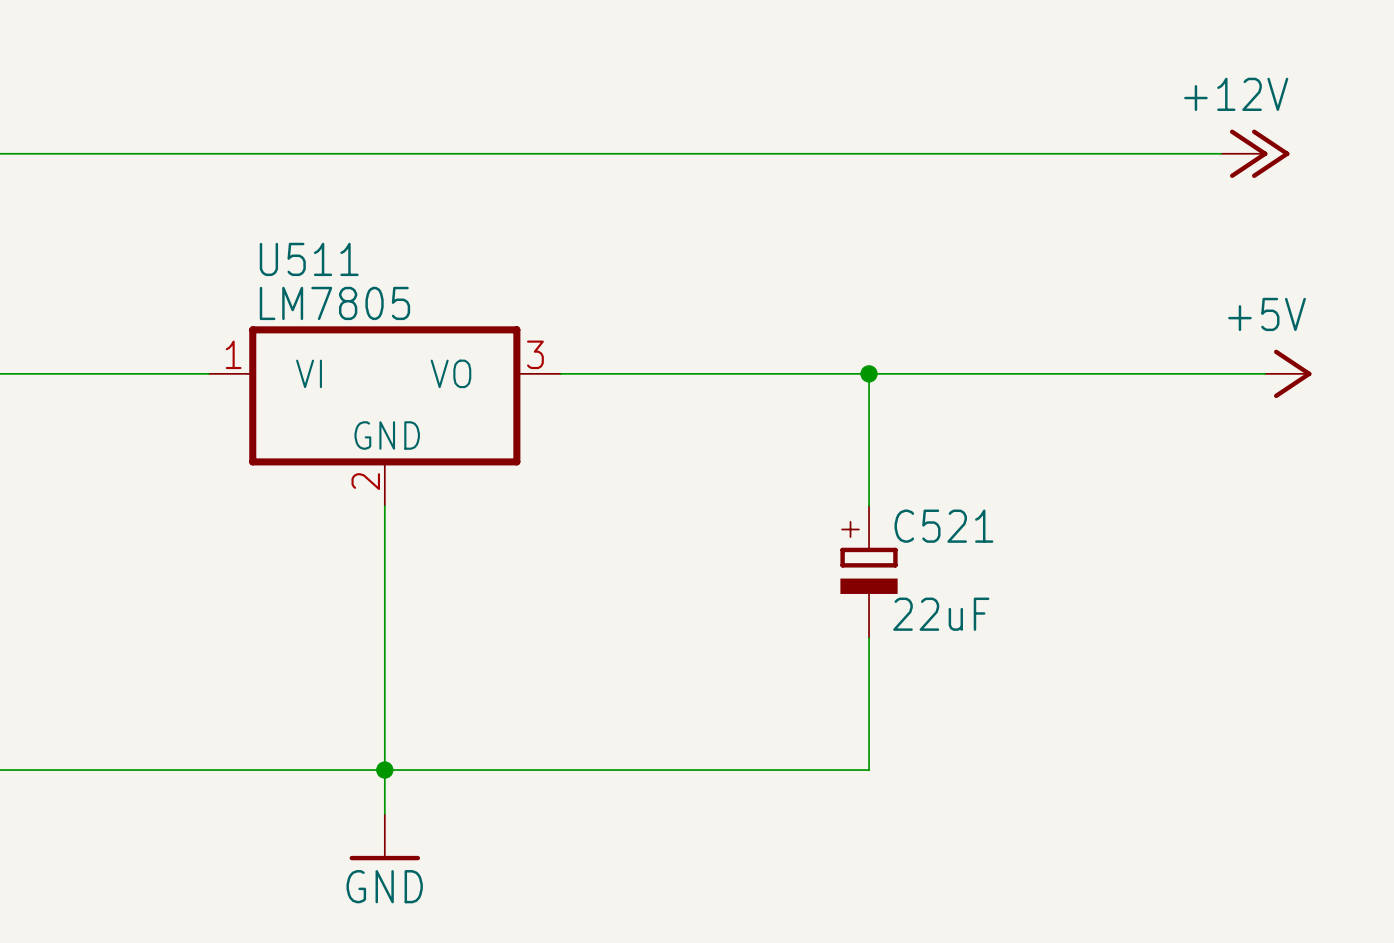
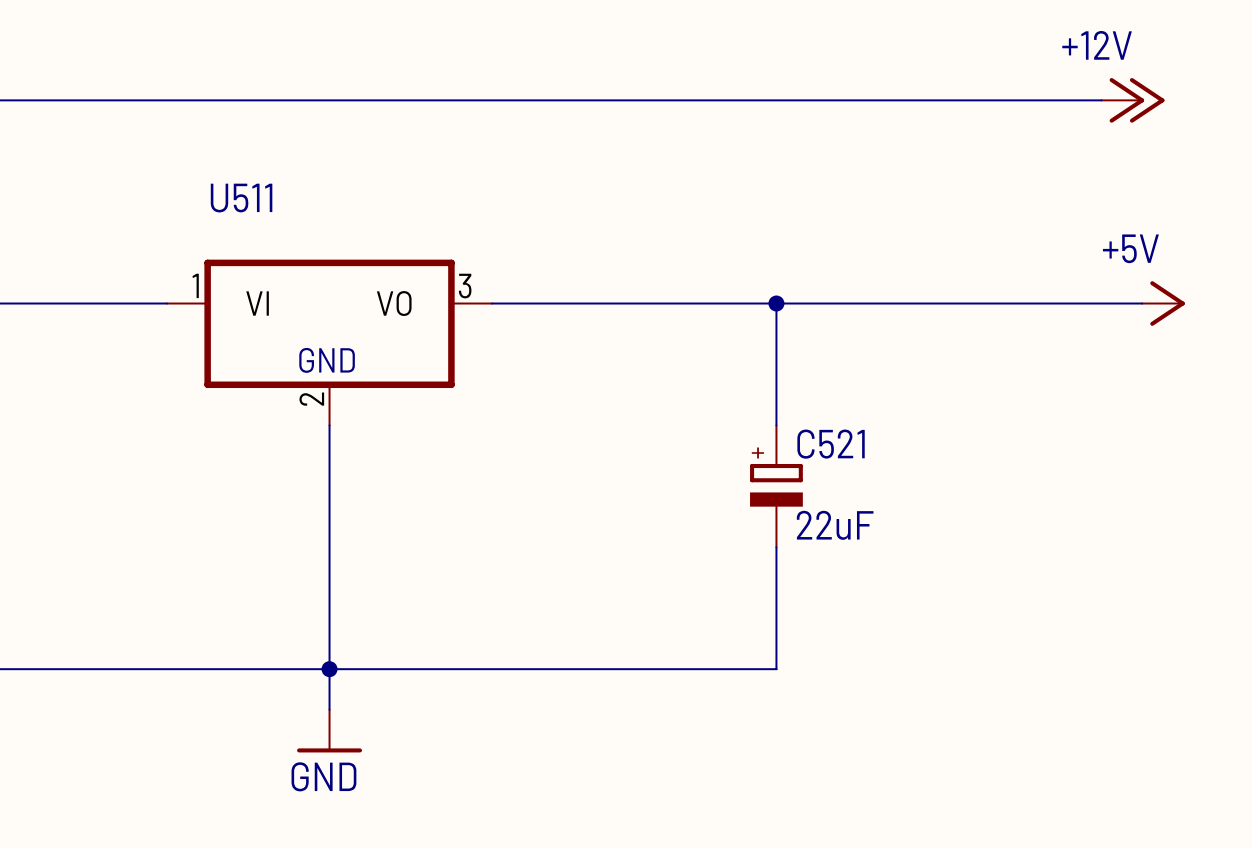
U511 value: LM7805 (334, 303) -> none

